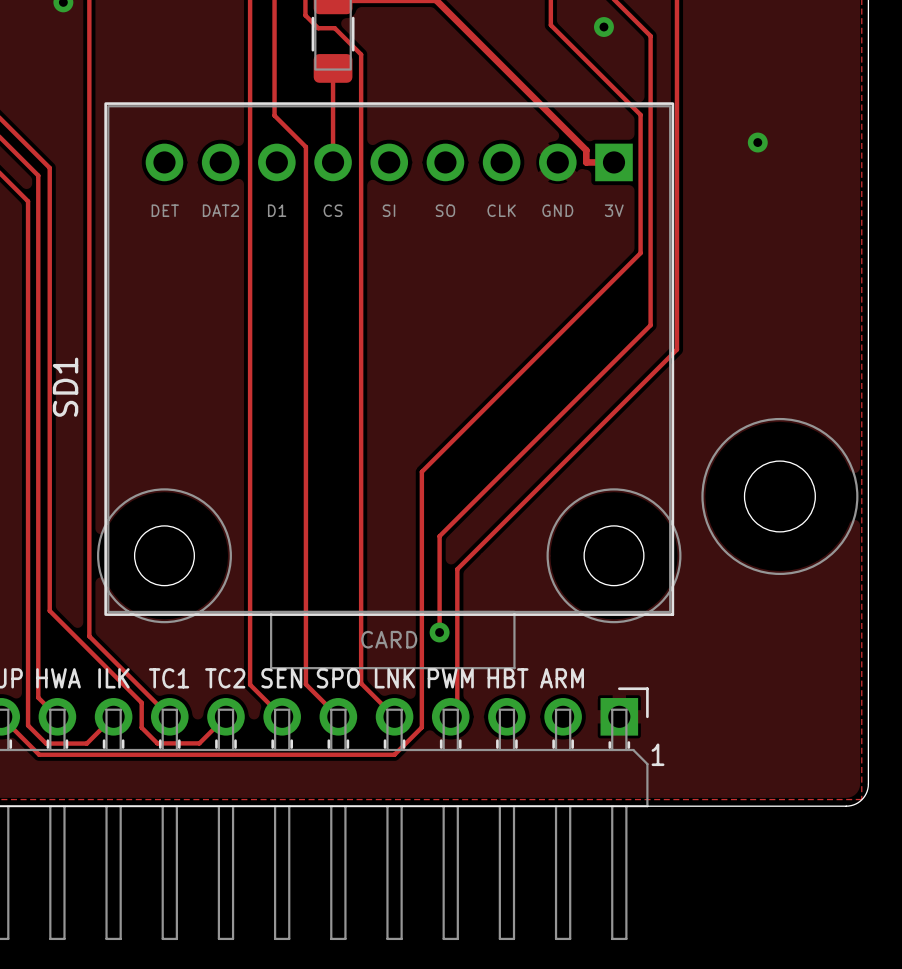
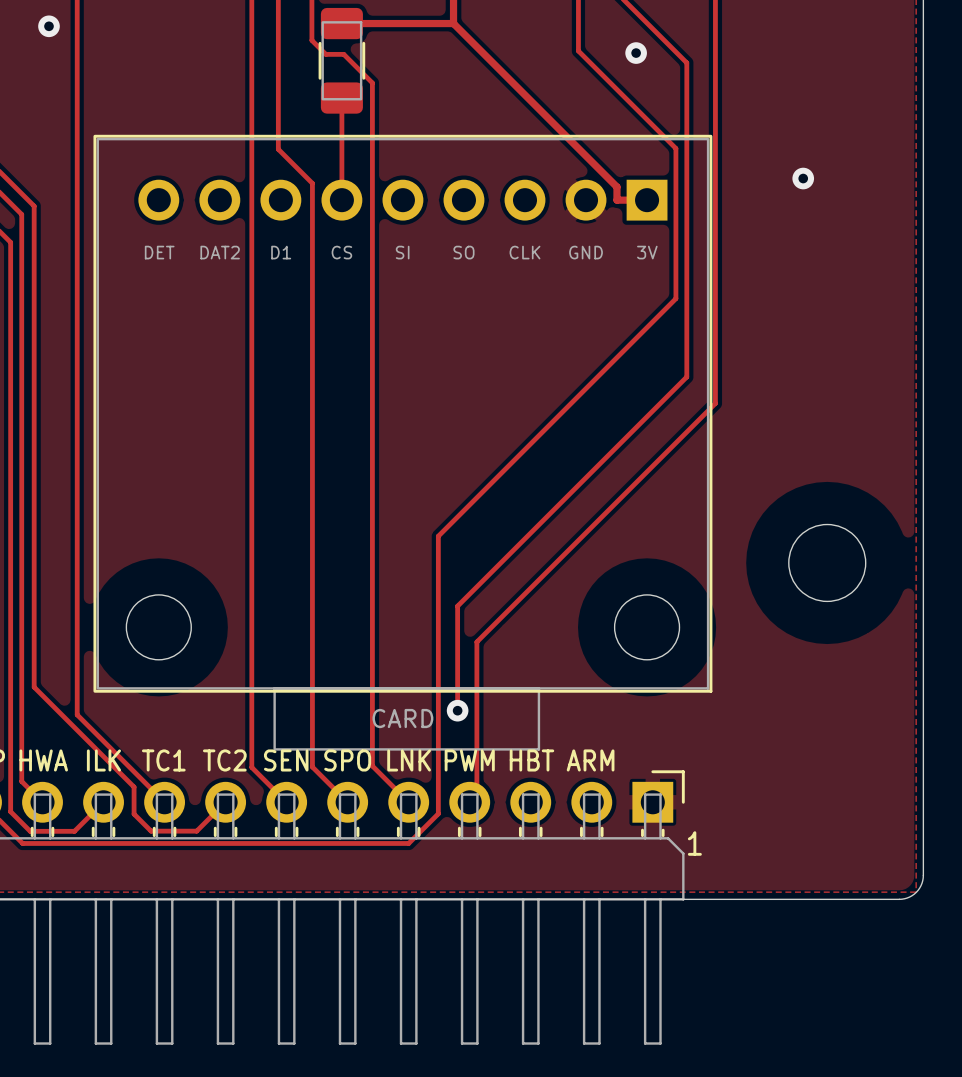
SD1 name: SD1 (65, 387) -> none
drawing: [546, 417, 859, 624] -> none
drawing: [97, 488, 232, 624] -> none

